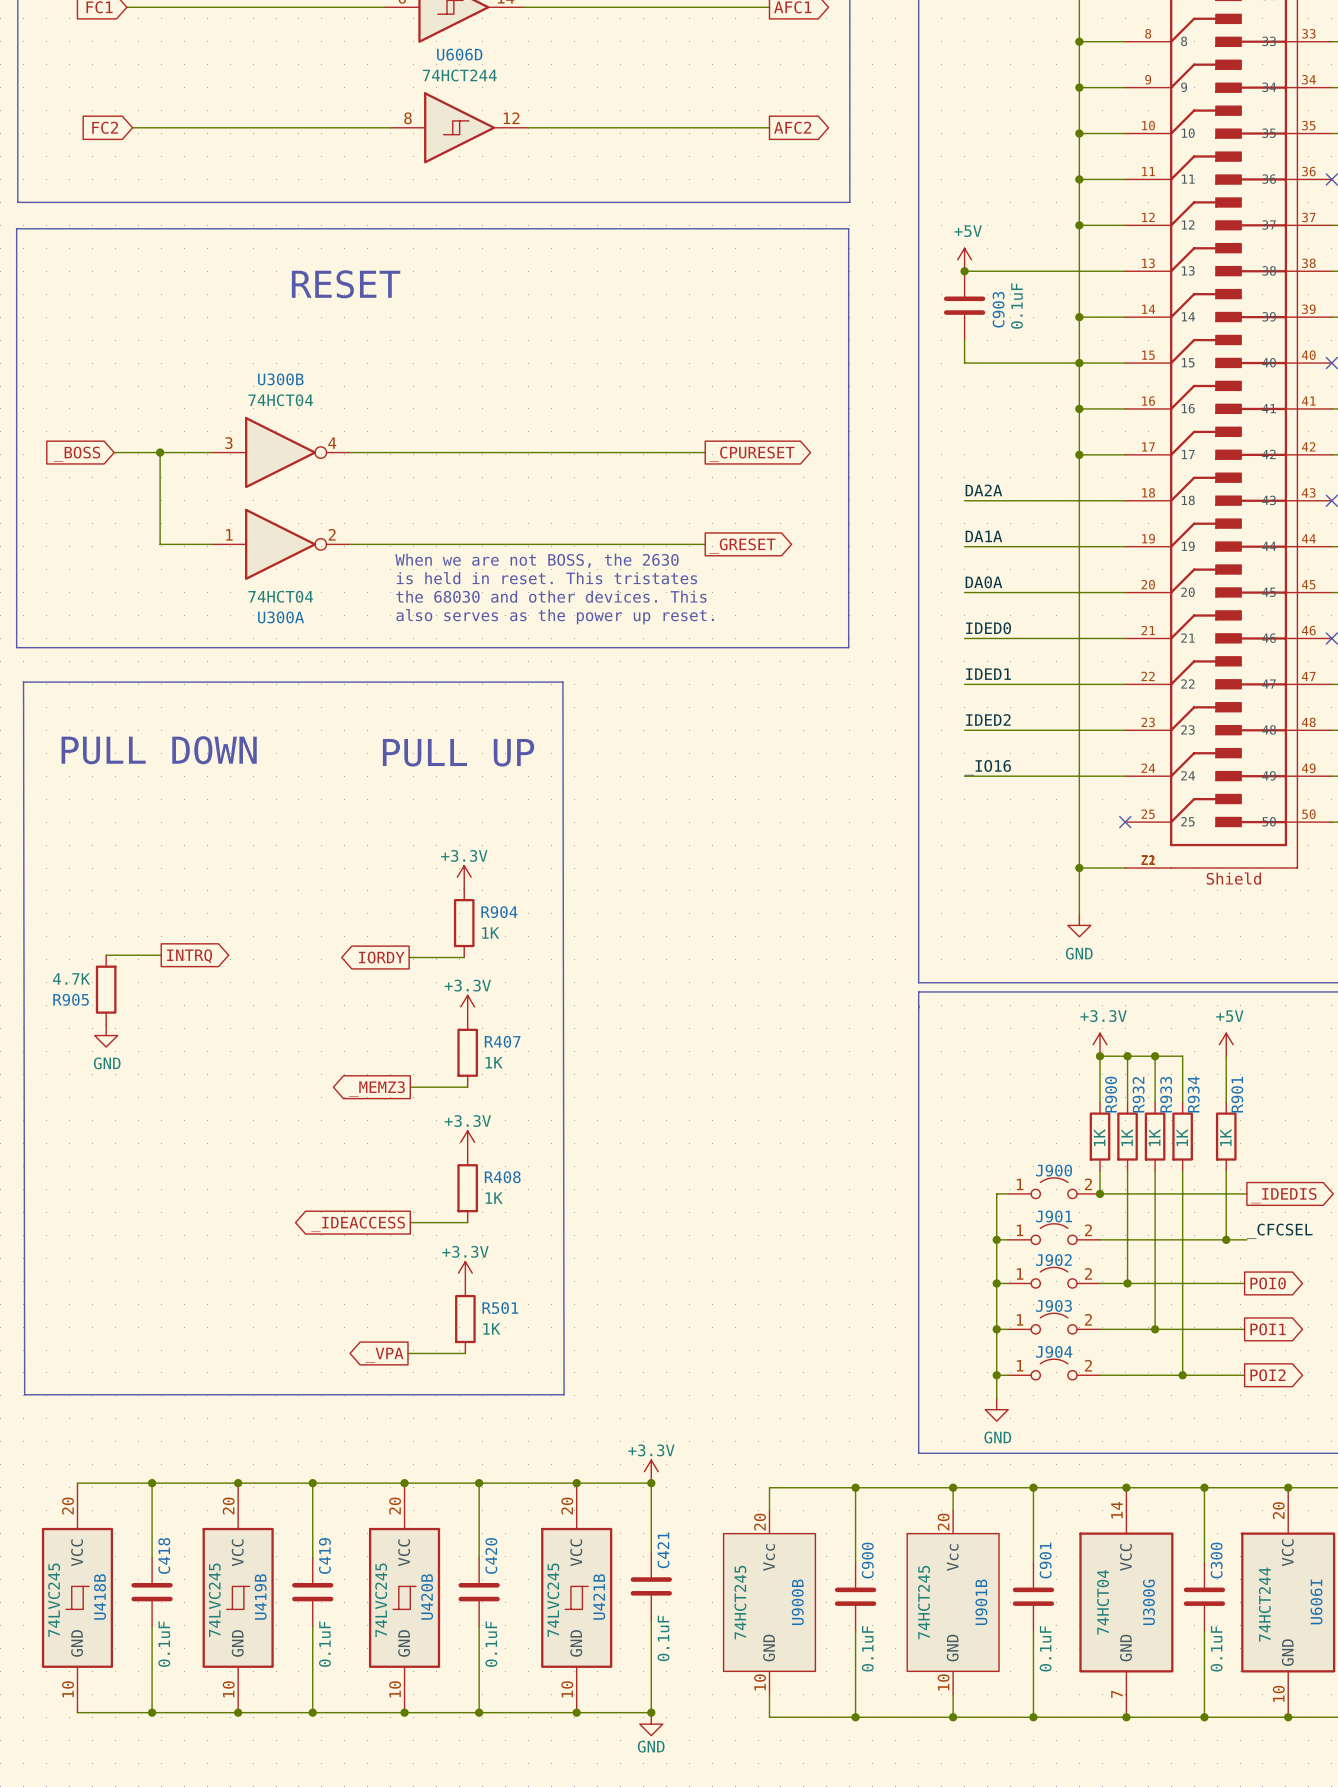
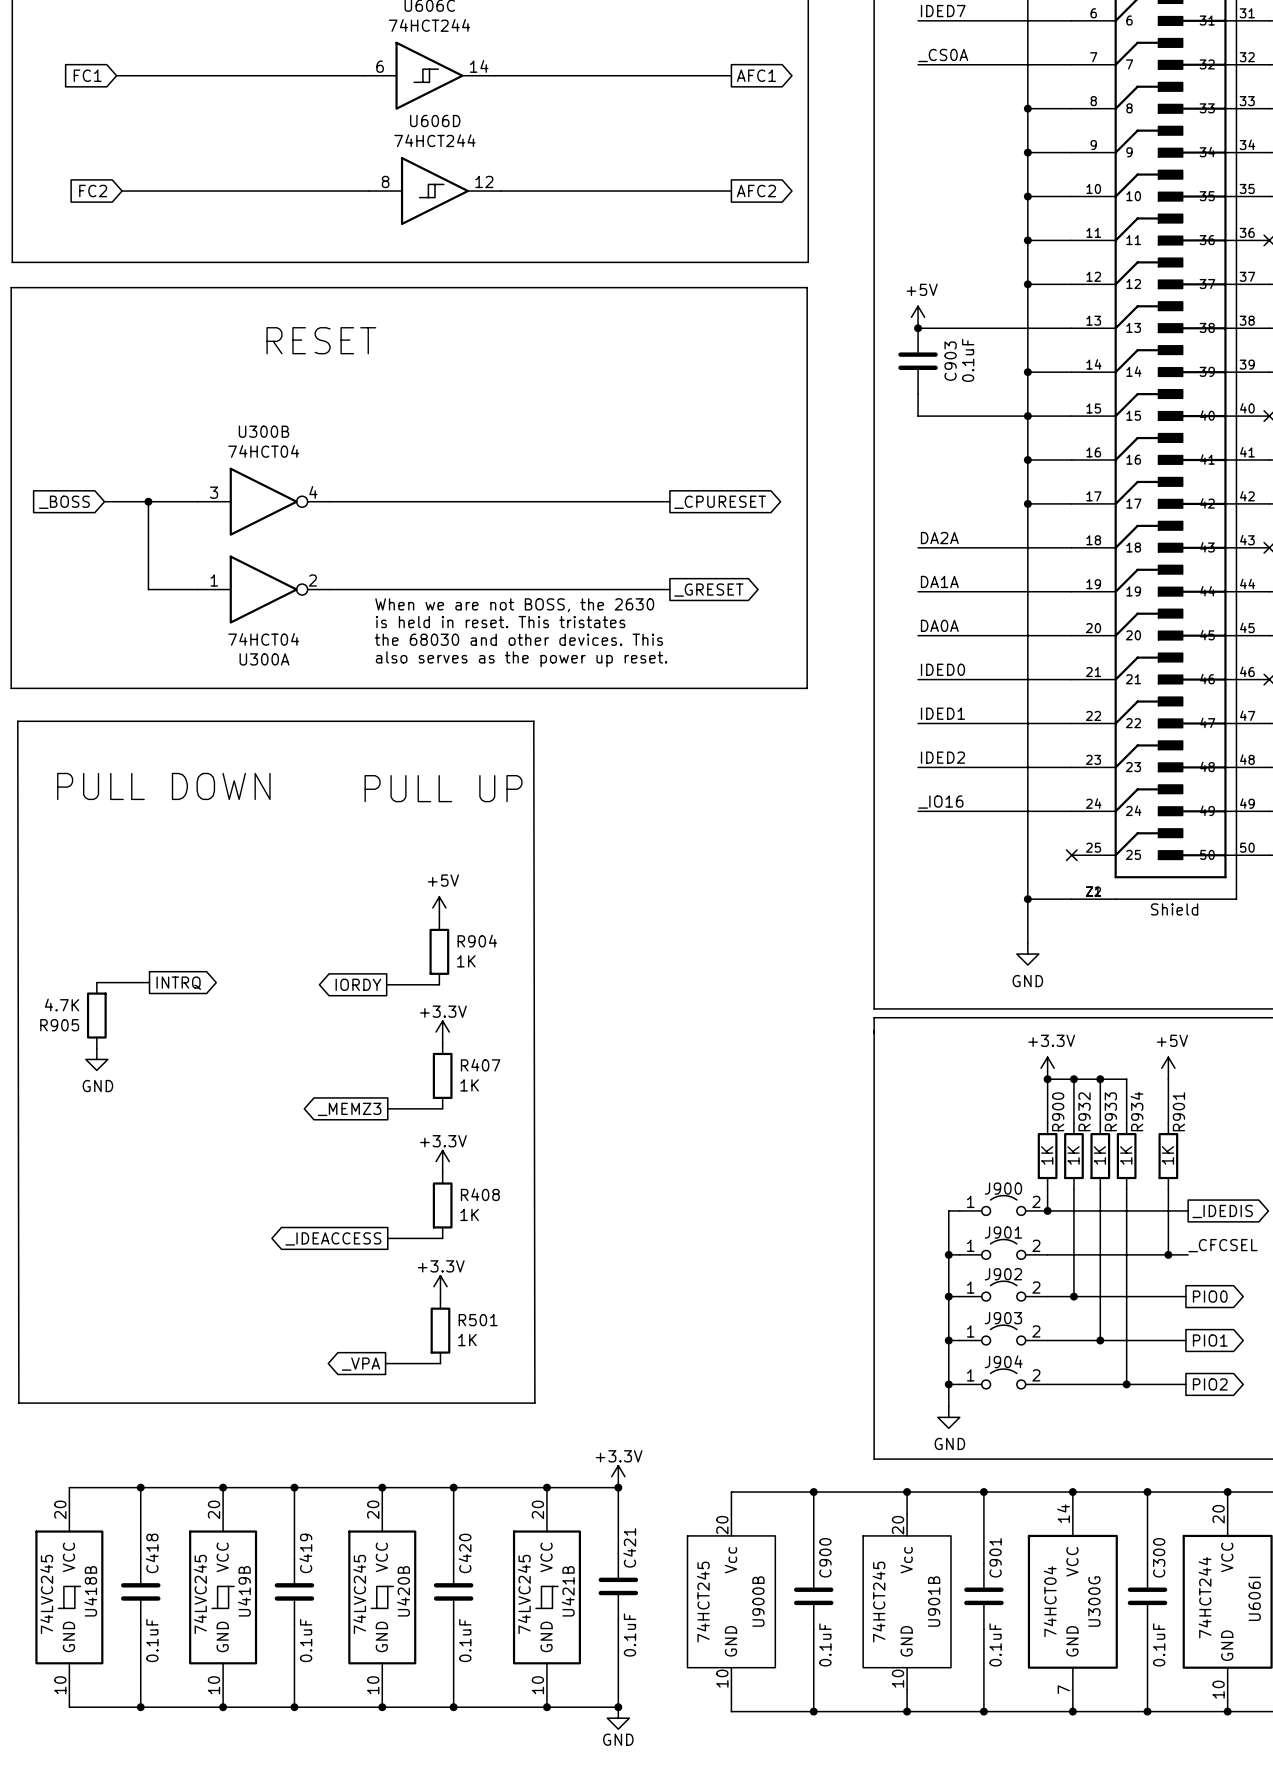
power symbol: +3.3V (464, 877) -> +5V (439, 907)
global label: POI0 (1268, 1283) -> PIO0 (1210, 1296)
global label: POI1 (1268, 1329) -> PIO1 (1210, 1340)
global label: POI2 (1267, 1375) -> PIO2 (1210, 1384)

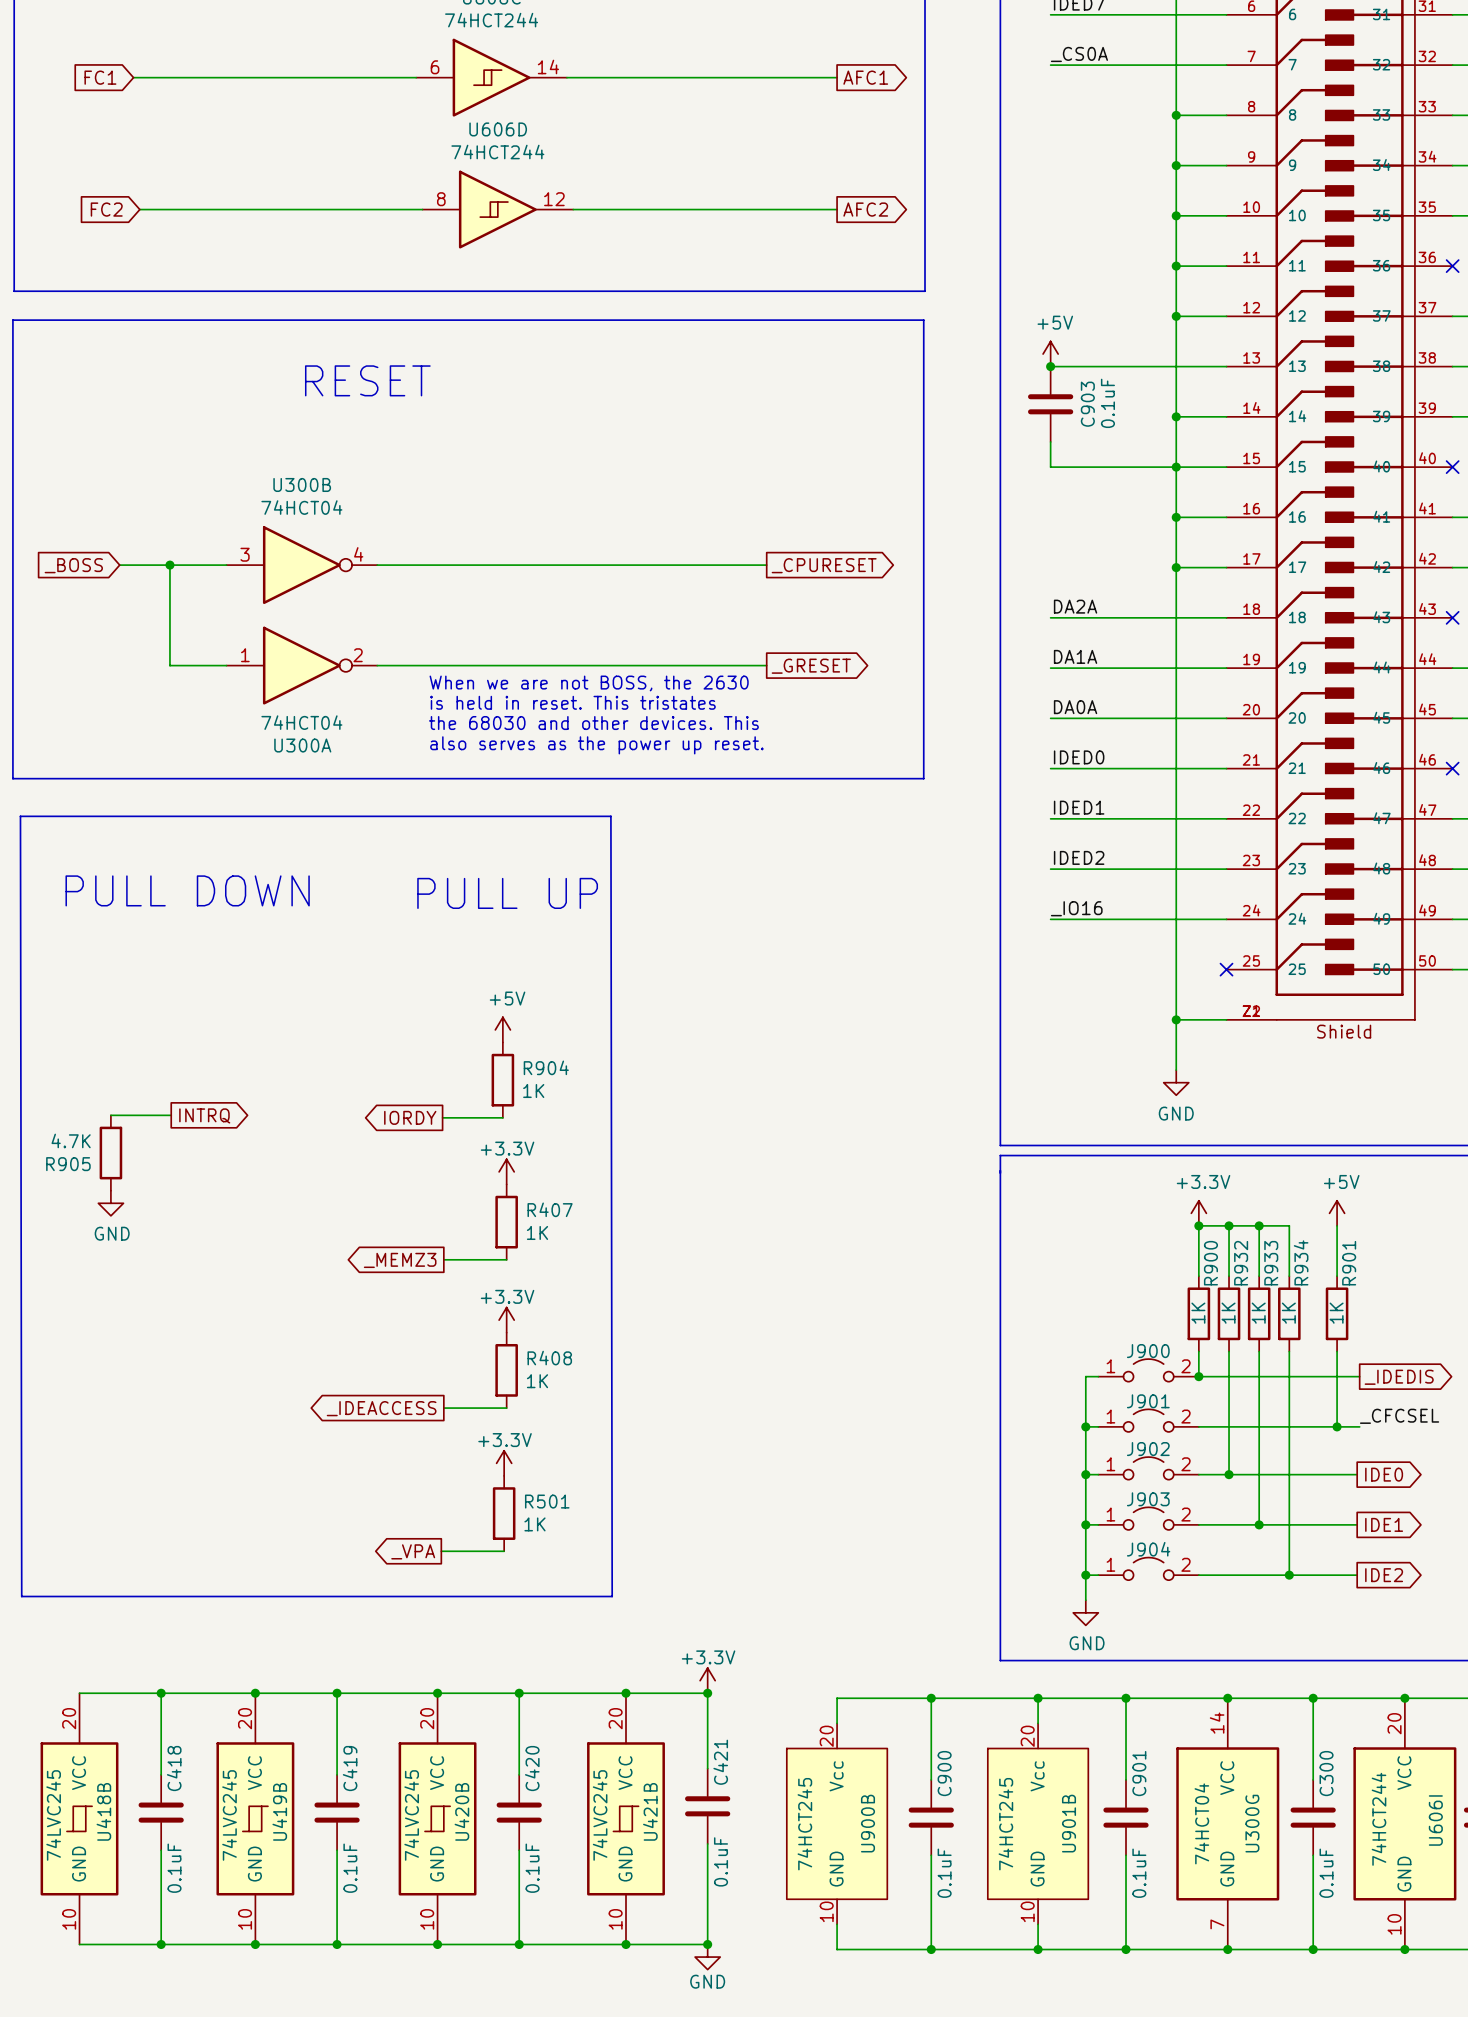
global label: PIO0 (1210, 1296) -> IDE0 (1384, 1474)
global label: PIO1 (1210, 1340) -> IDE1 (1384, 1524)
global label: PIO2 (1210, 1384) -> IDE2 (1384, 1575)

